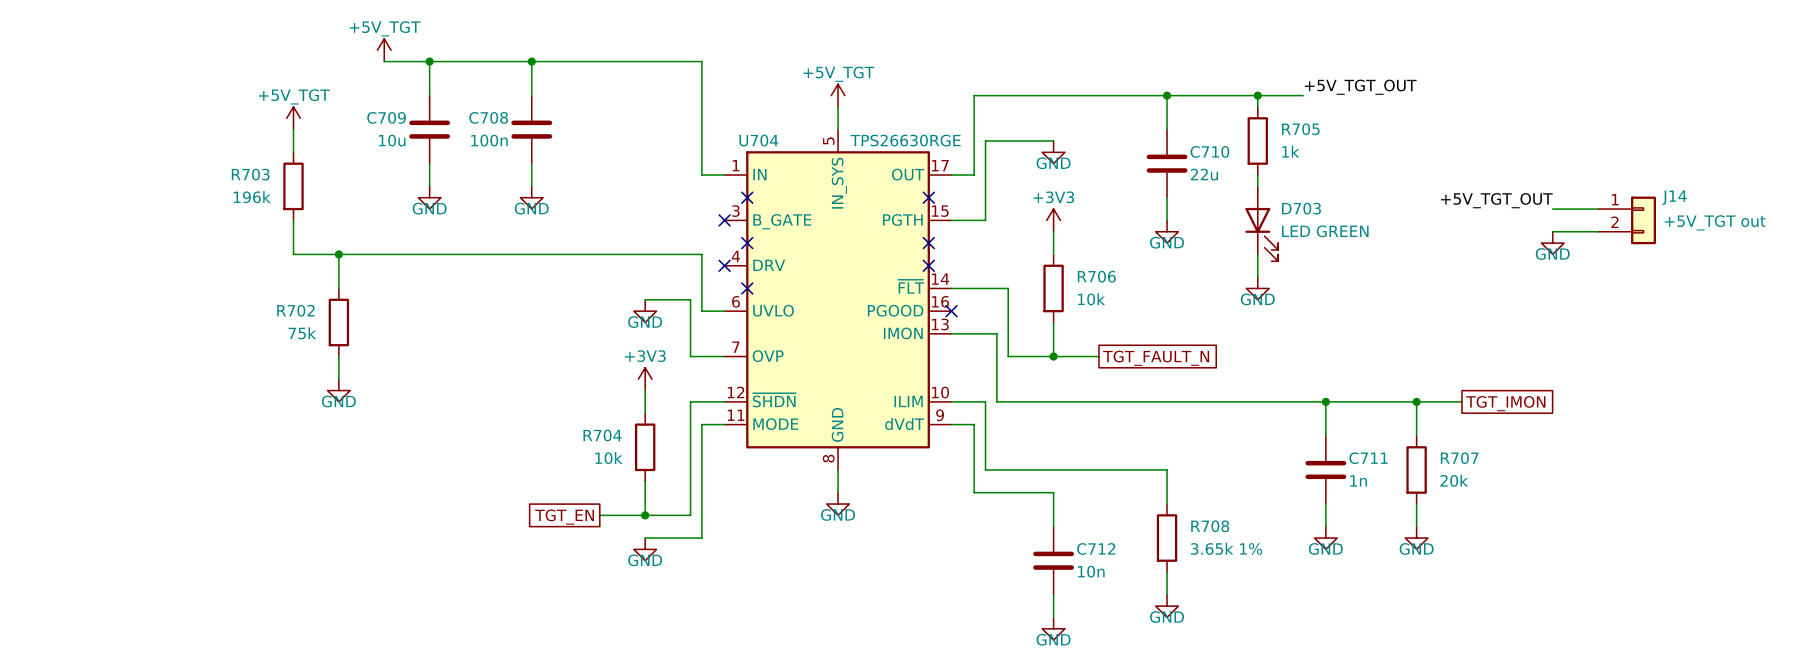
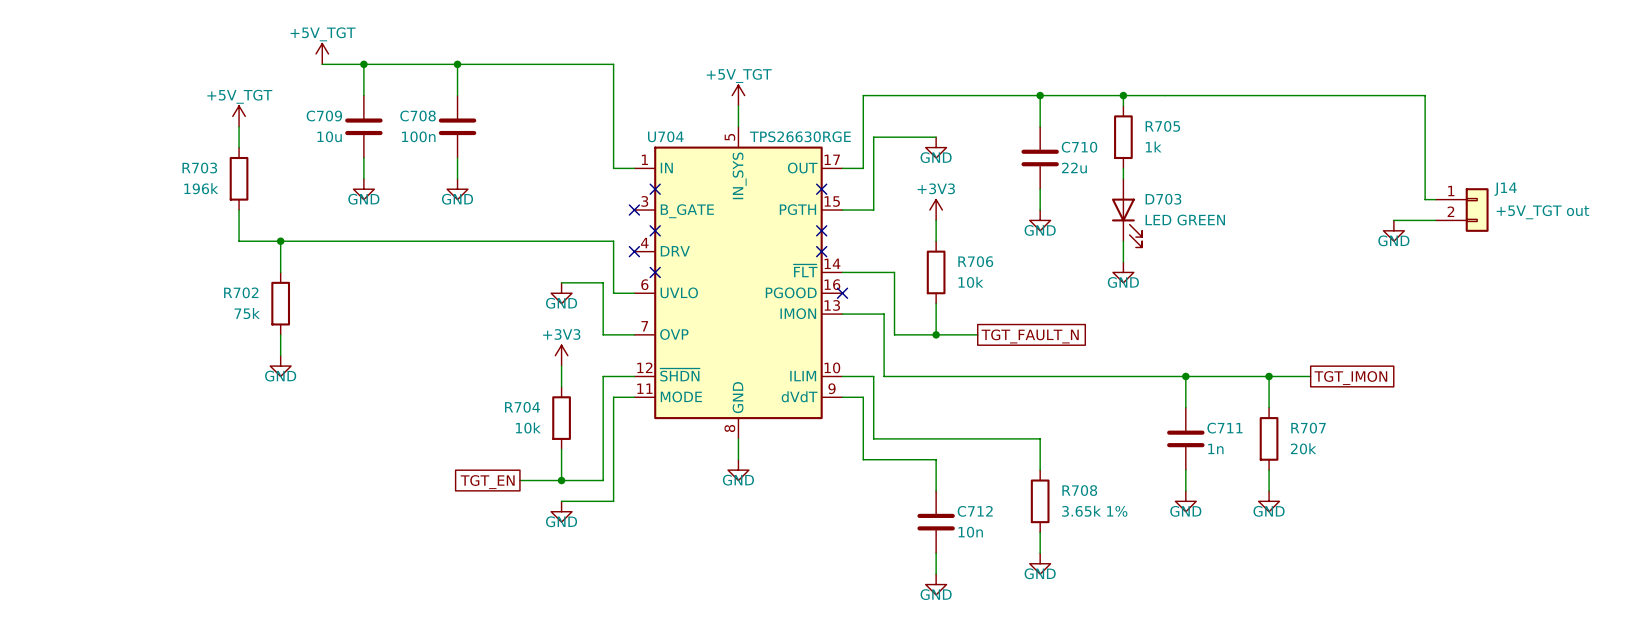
label: +5V_TGT_OUT (1360, 87) -> none
label: +5V_TGT_OUT (1496, 200) -> none
wire: (1552, 209) (1586, 209) -> (1165, 95) (1425, 95) (1425, 199)

